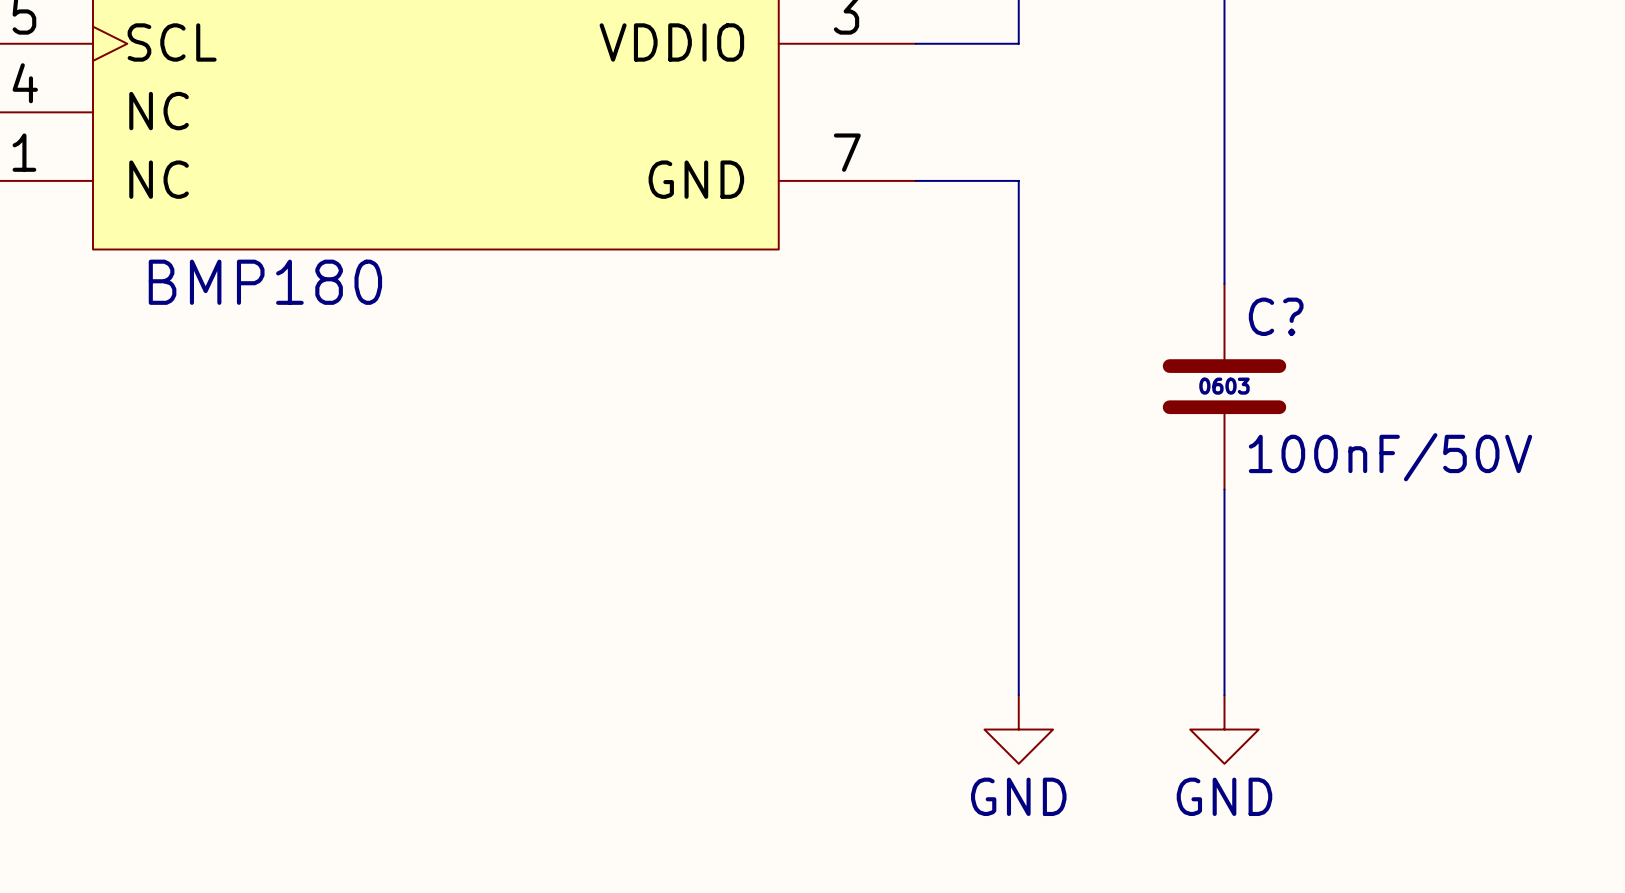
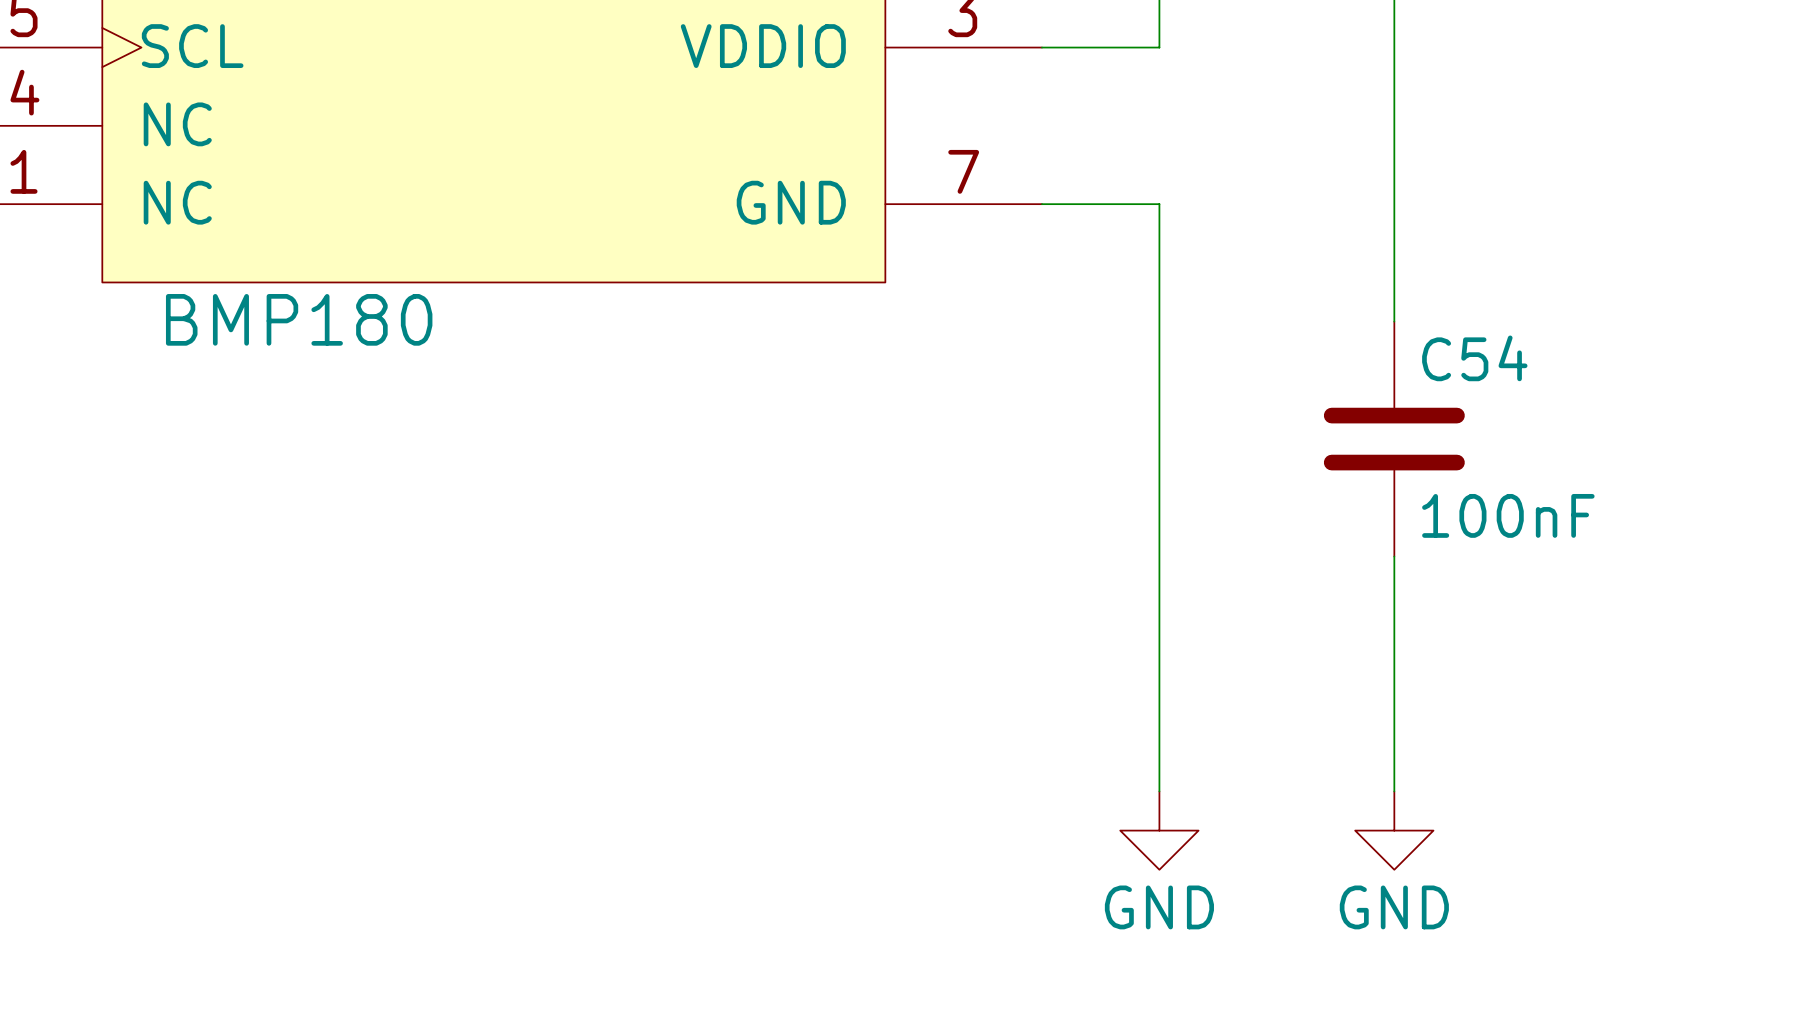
C? name: C? (1276, 316) -> C54 (1474, 358)
C? text: 0603 (1224, 386) -> none
C? value: 100nF/50V (1390, 457) -> 100nF (1508, 515)

